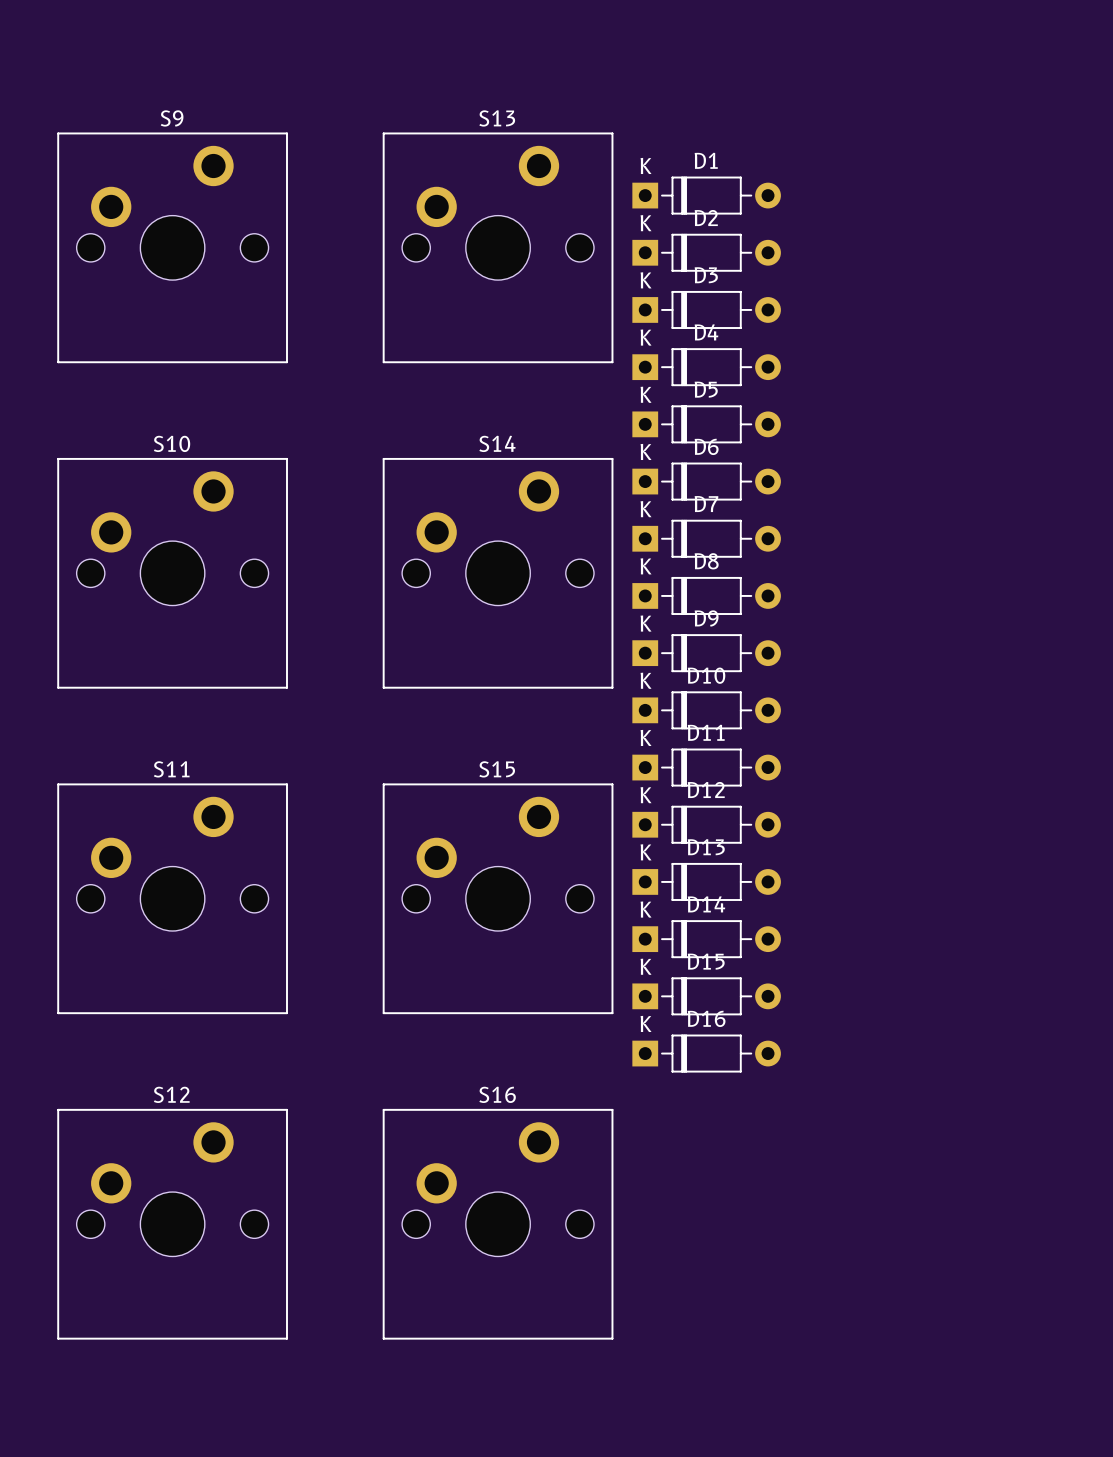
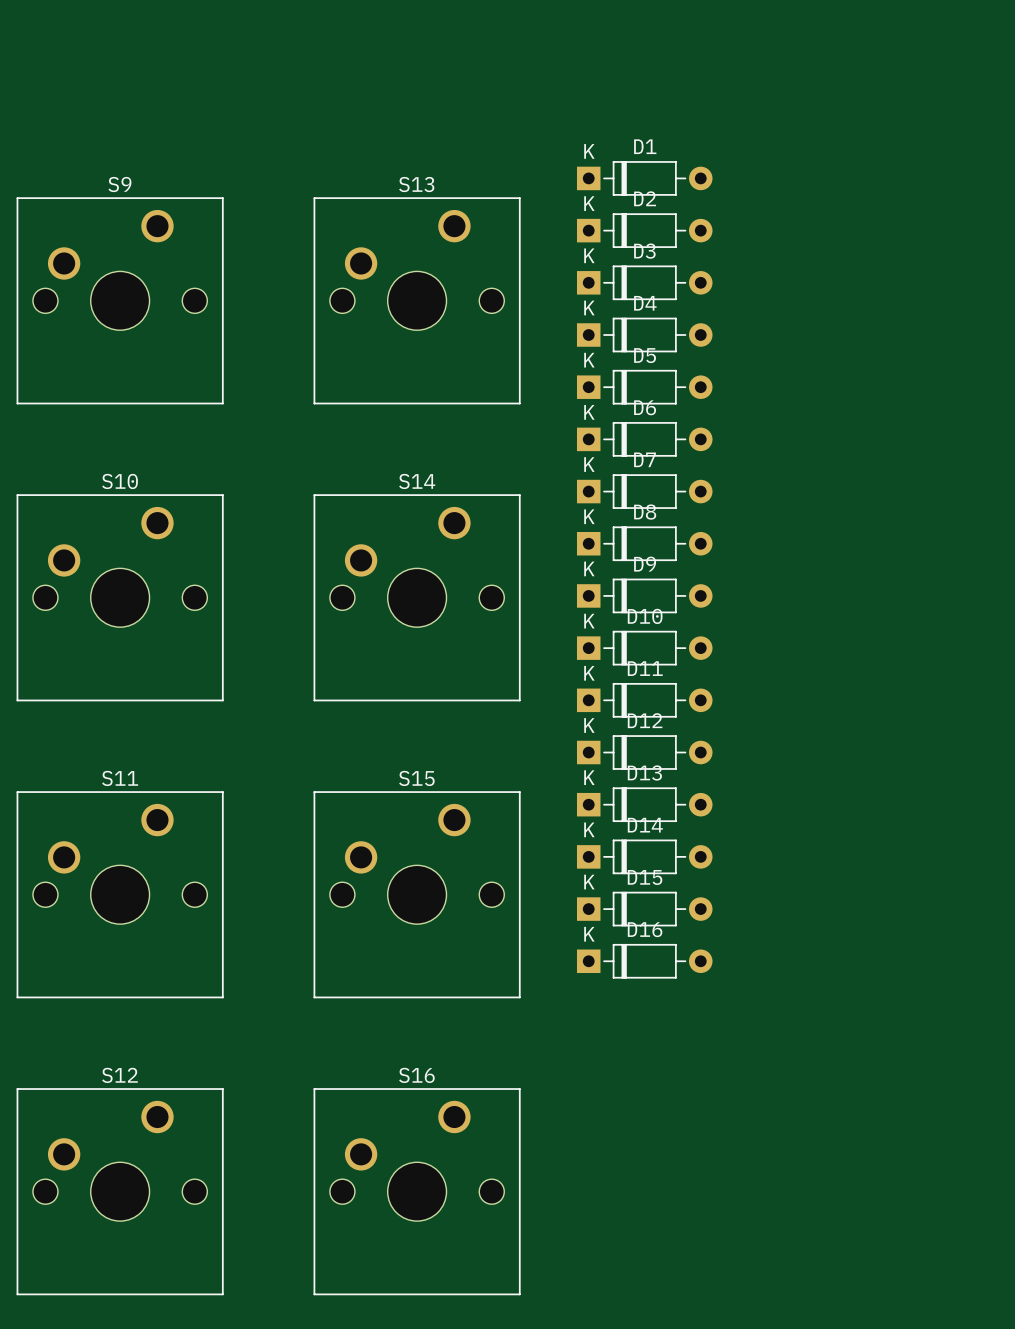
S9 footprint: [57, 132, 288, 364] -> [16, 197, 224, 405]
S13 footprint: [382, 132, 614, 364] -> [313, 197, 521, 405]
S10 footprint: [57, 457, 288, 689] -> [16, 494, 224, 702]
S14 footprint: [382, 457, 614, 689] -> [313, 494, 521, 702]
S11 footprint: [57, 783, 288, 1015] -> [16, 791, 224, 999]
S15 footprint: [382, 783, 614, 1015] -> [313, 791, 521, 999]
S12 footprint: [57, 1108, 288, 1340] -> [16, 1088, 224, 1296]
S16 footprint: [382, 1108, 614, 1340] -> [313, 1088, 521, 1296]

